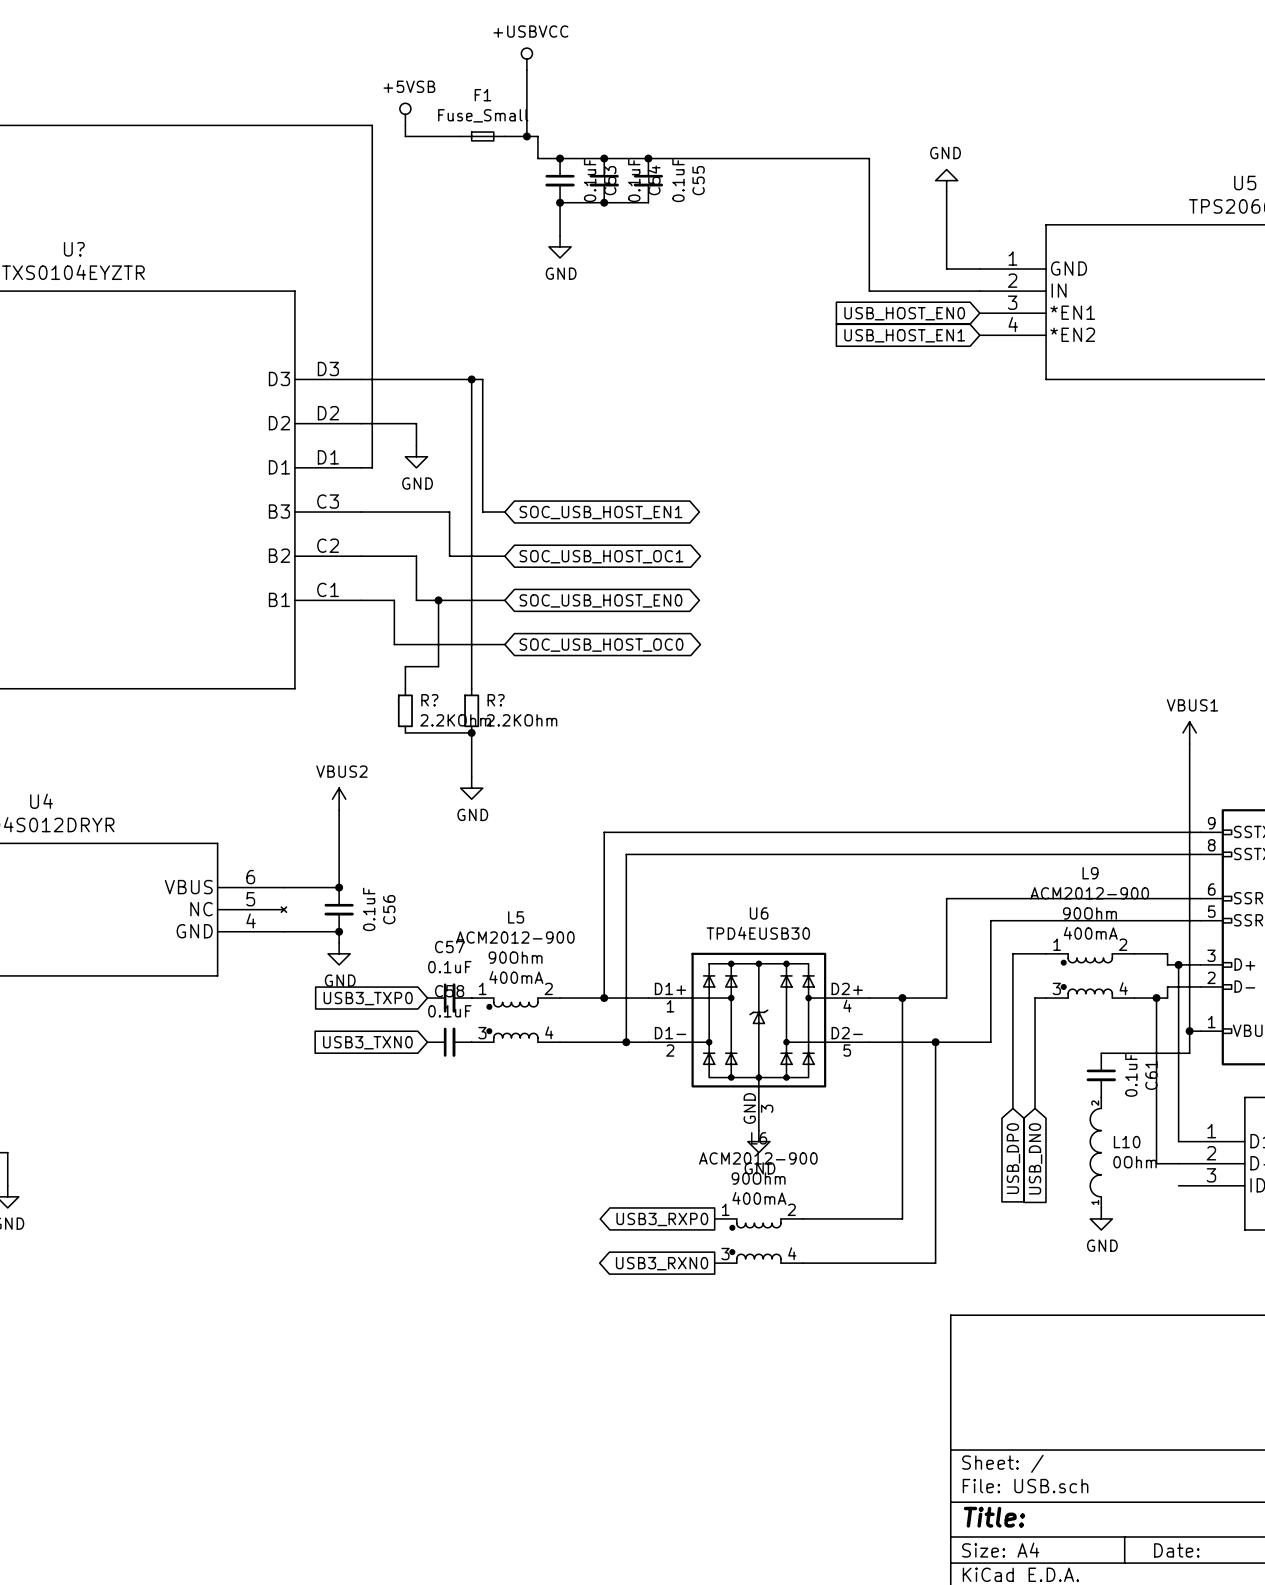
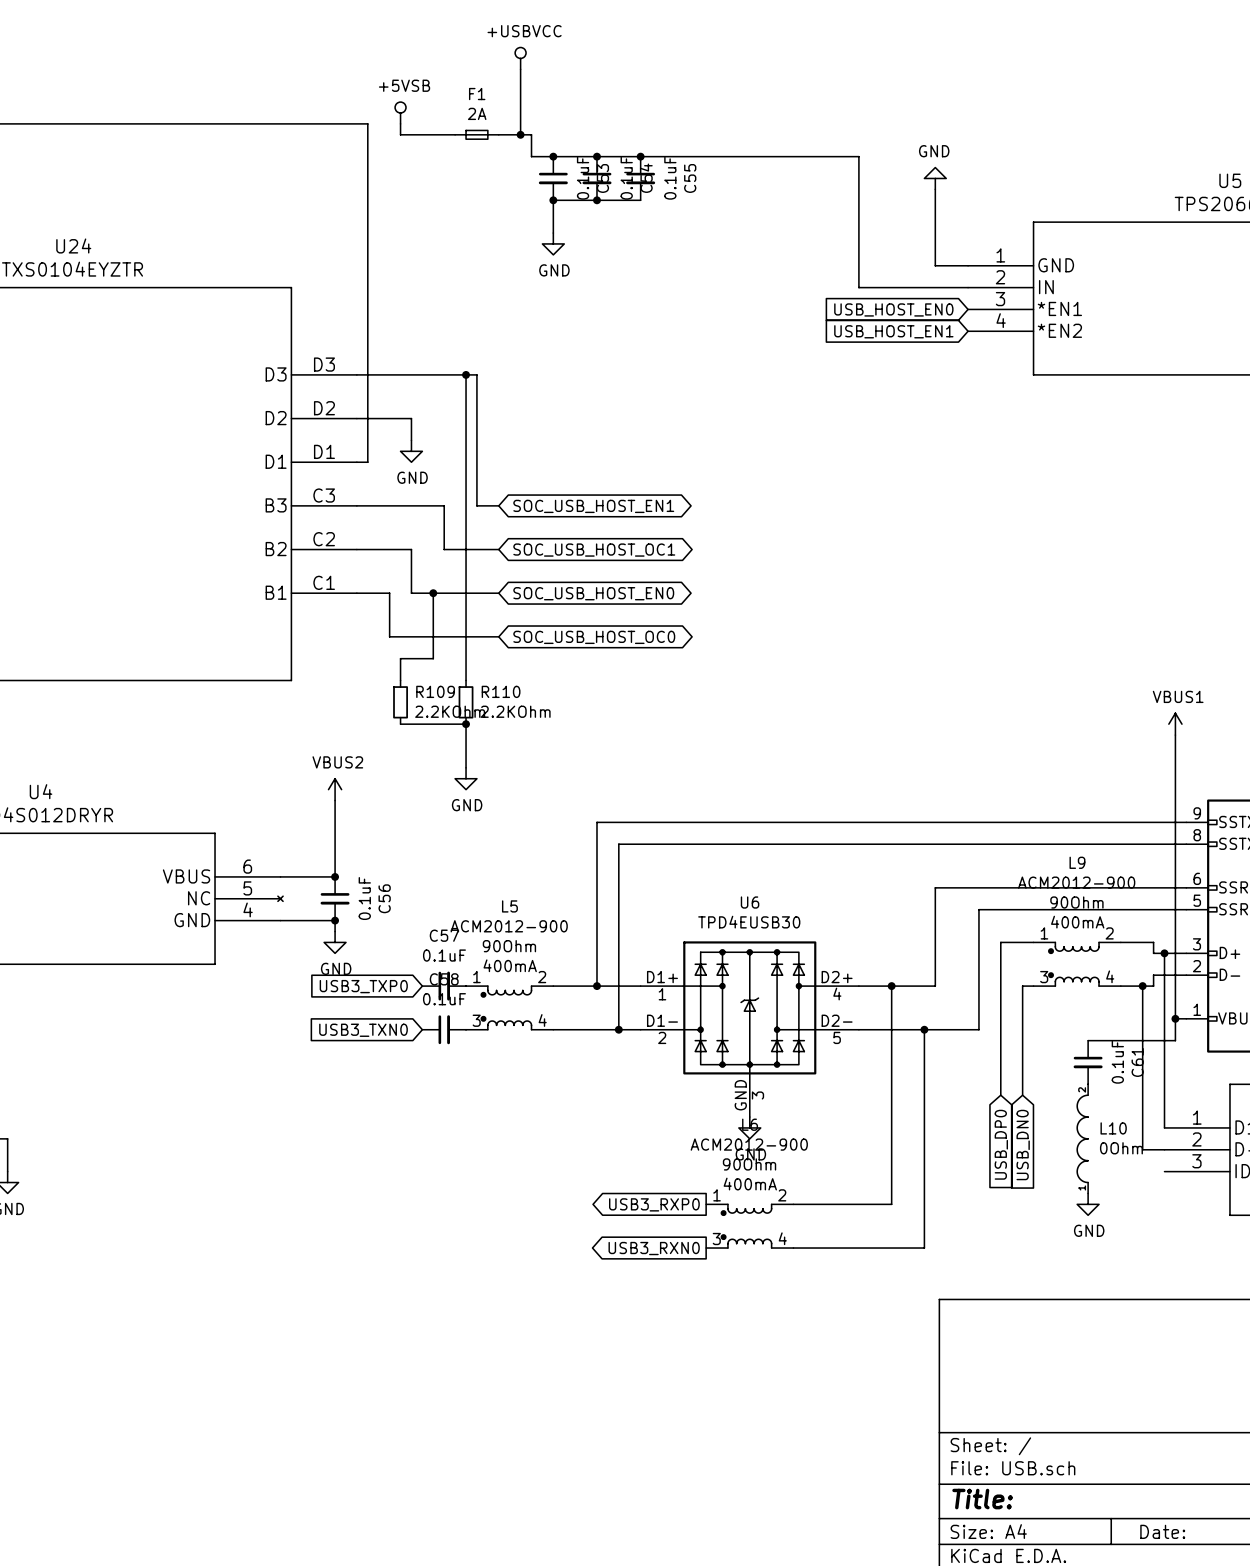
F1 value: Fuse_Small (483, 115) -> 2A (477, 113)
U? name: U? (74, 249) -> U24 (73, 245)
R? name: R? (429, 700) -> R109 (435, 691)
R? name: R? (496, 700) -> R110 (501, 691)

